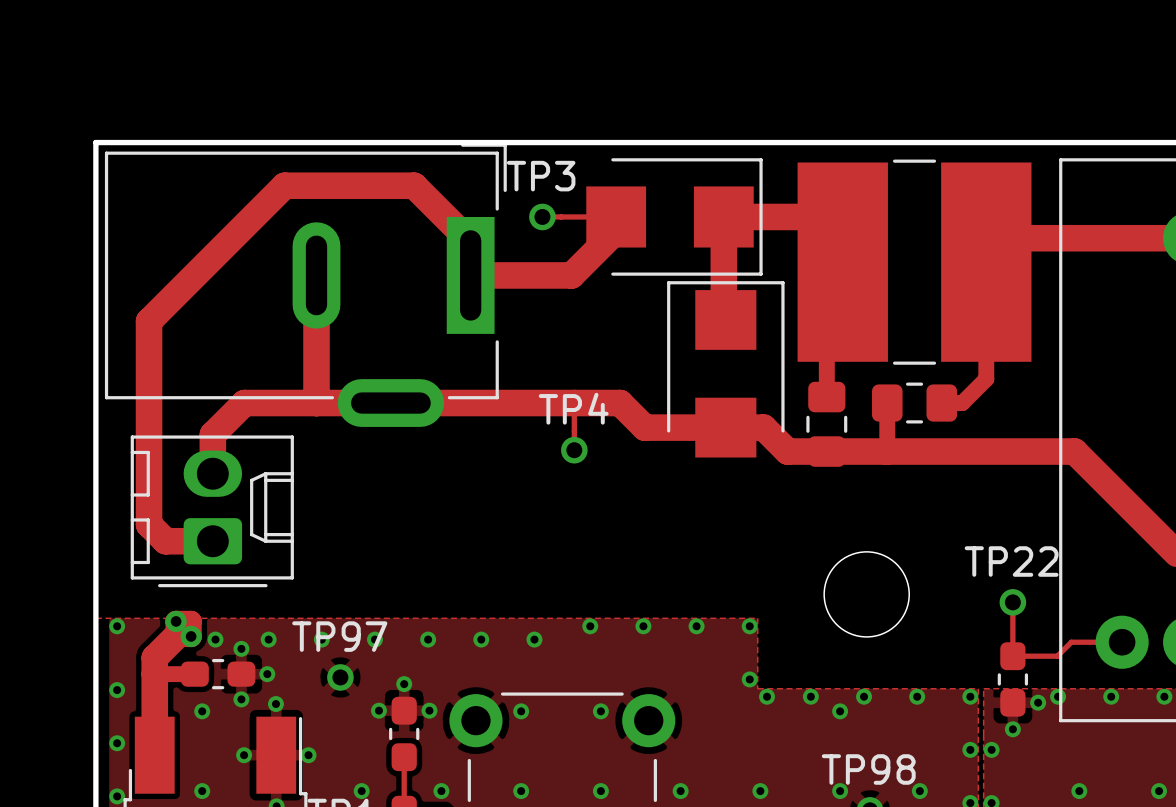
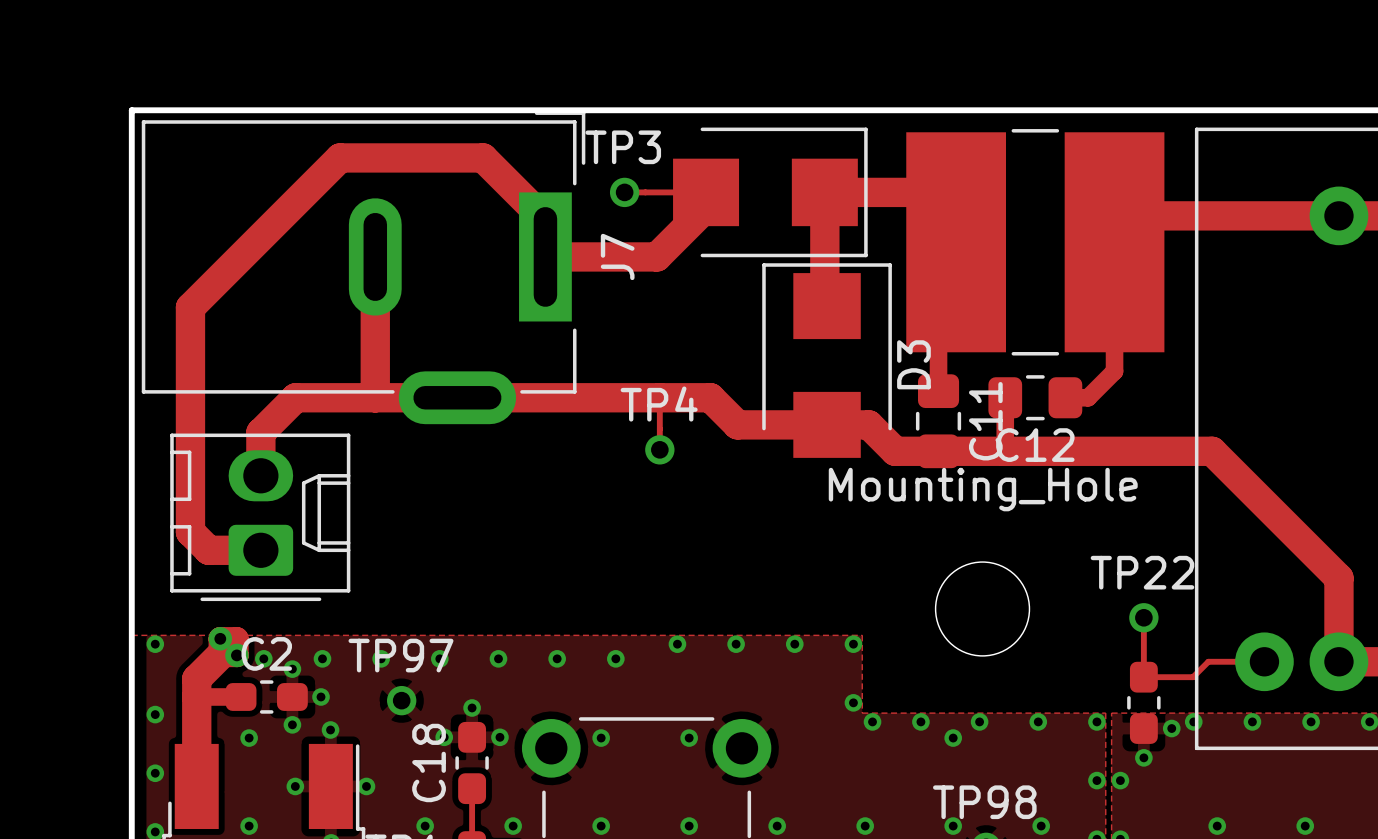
J7 name: none -> J7 (617, 256)
D3 name: none -> D3 (913, 364)
C11 name: none -> C11 (985, 421)
C12 name: none -> C12 (1035, 445)
Mounting_Hole name: none -> Mounting_Hole (983, 489)
C2 name: none -> C2 (266, 653)
C18 name: none -> C18 (429, 762)

